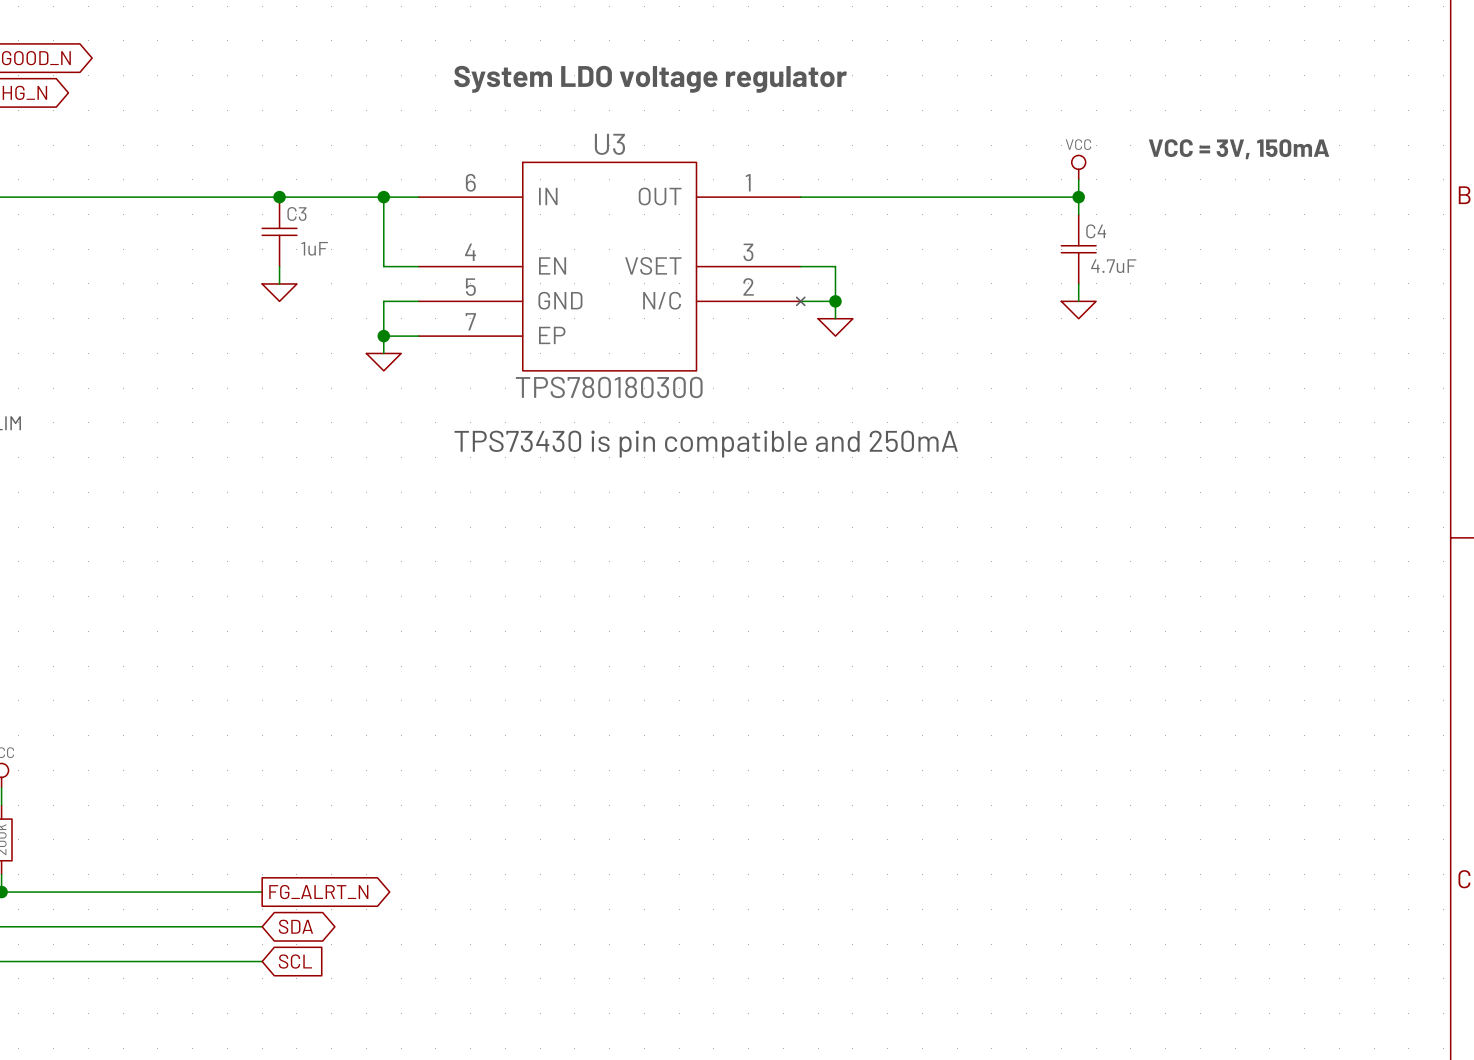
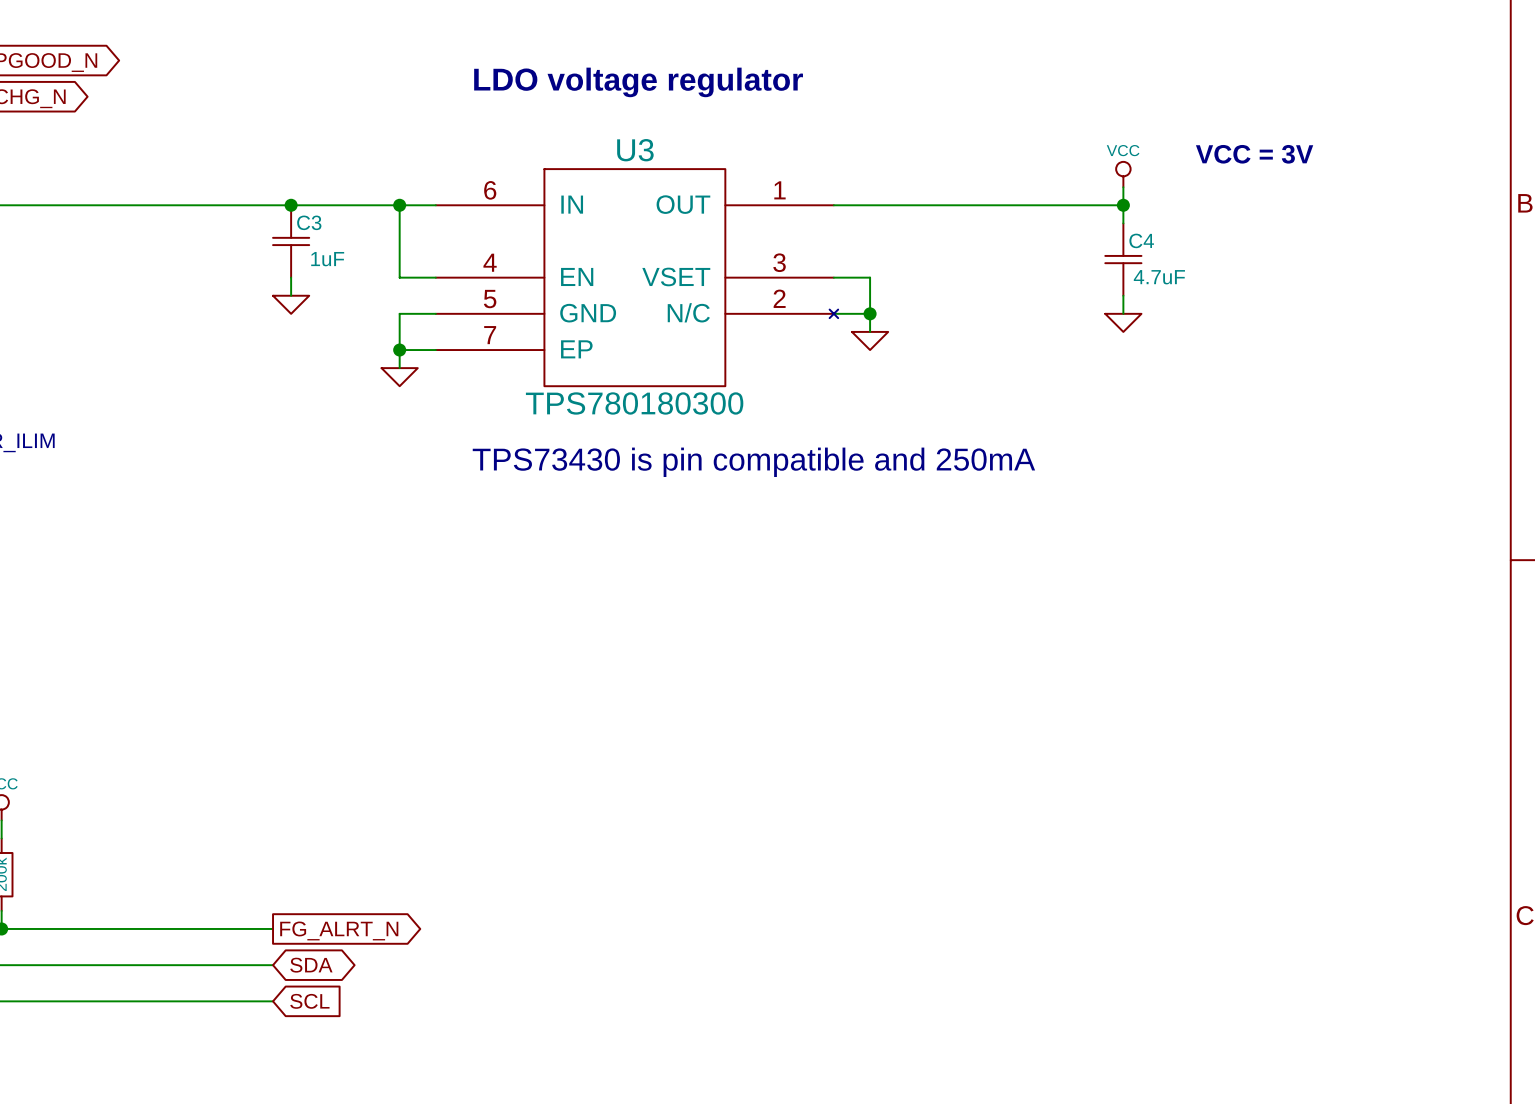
text: System LDO voltage regulator (650, 79) -> LDO voltage regulator (638, 82)
text: VCC = 3V, 150mA (1239, 149) -> VCC = 3V (1254, 154)

